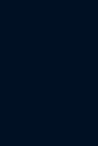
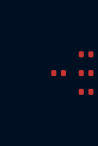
part: none -> (86, 54)
part: none -> (58, 73)
part: none -> (86, 73)
part: none -> (86, 91)

